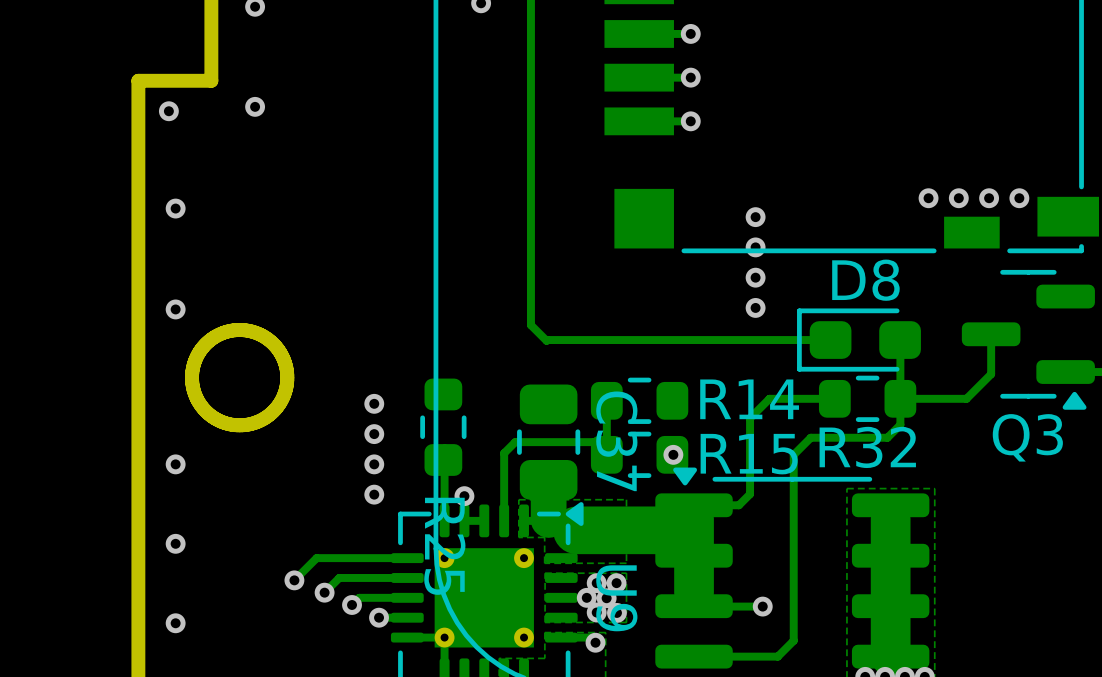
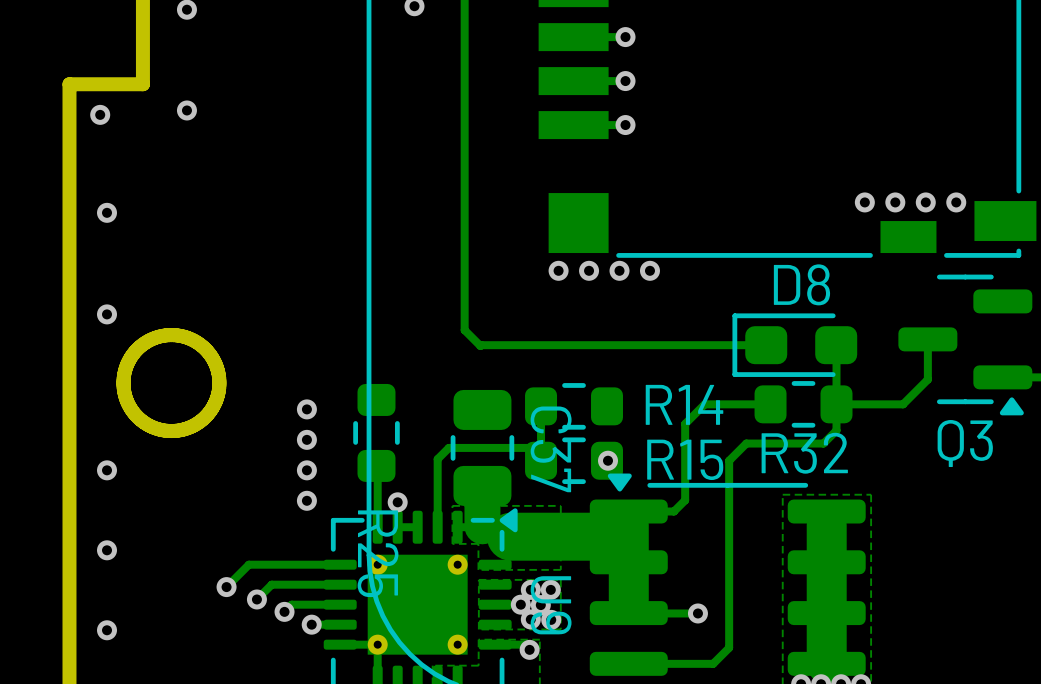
via: (755, 217) -> none
via: (755, 247) -> none
via: none -> (558, 270)
via: none -> (589, 270)
via: none -> (619, 270)
via: none -> (649, 270)
via: (755, 277) -> none
via: (755, 307) -> none

